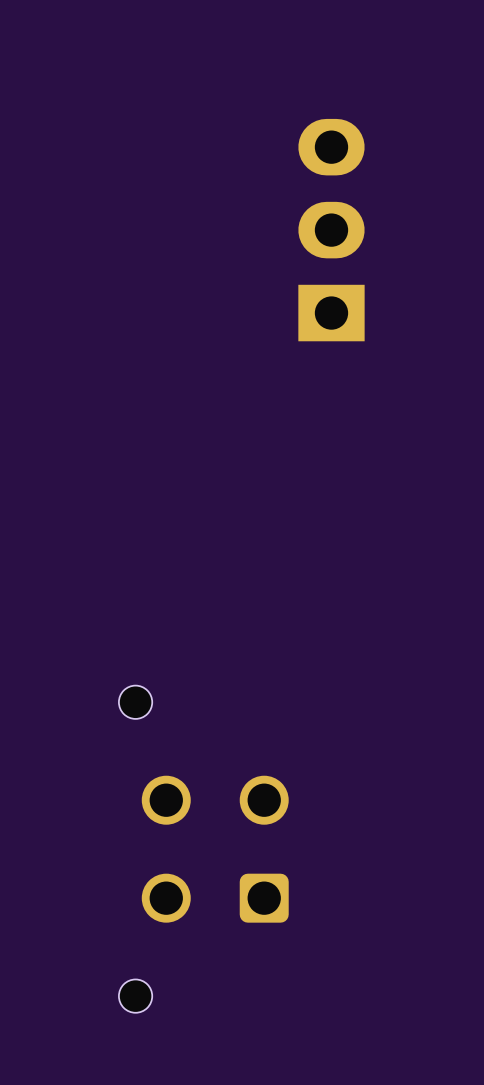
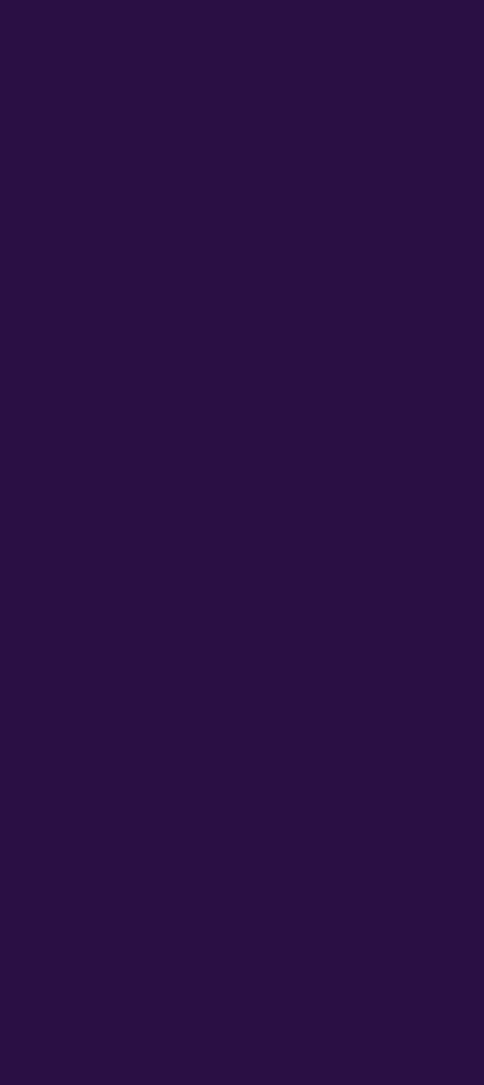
part: (331, 230) -> none
part: (203, 849) -> none

